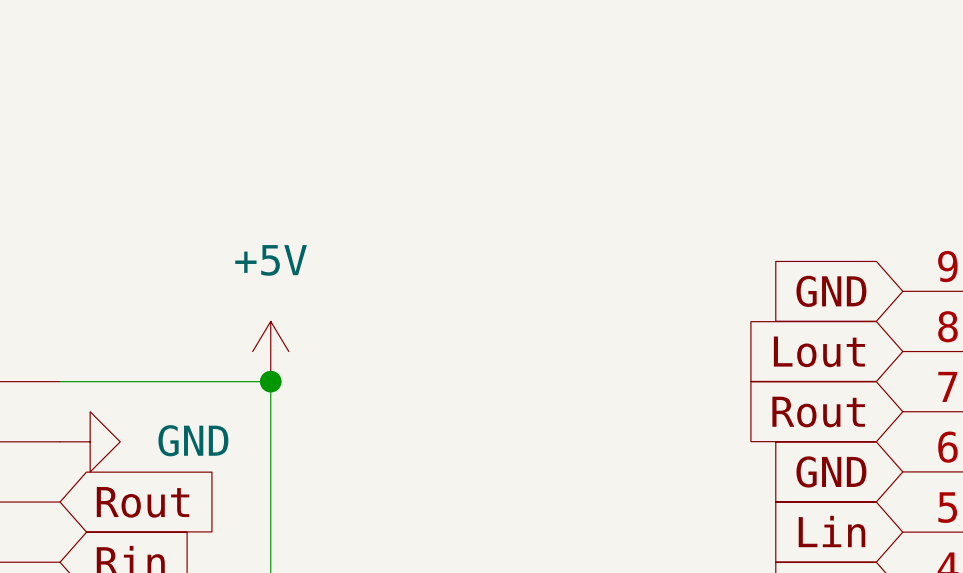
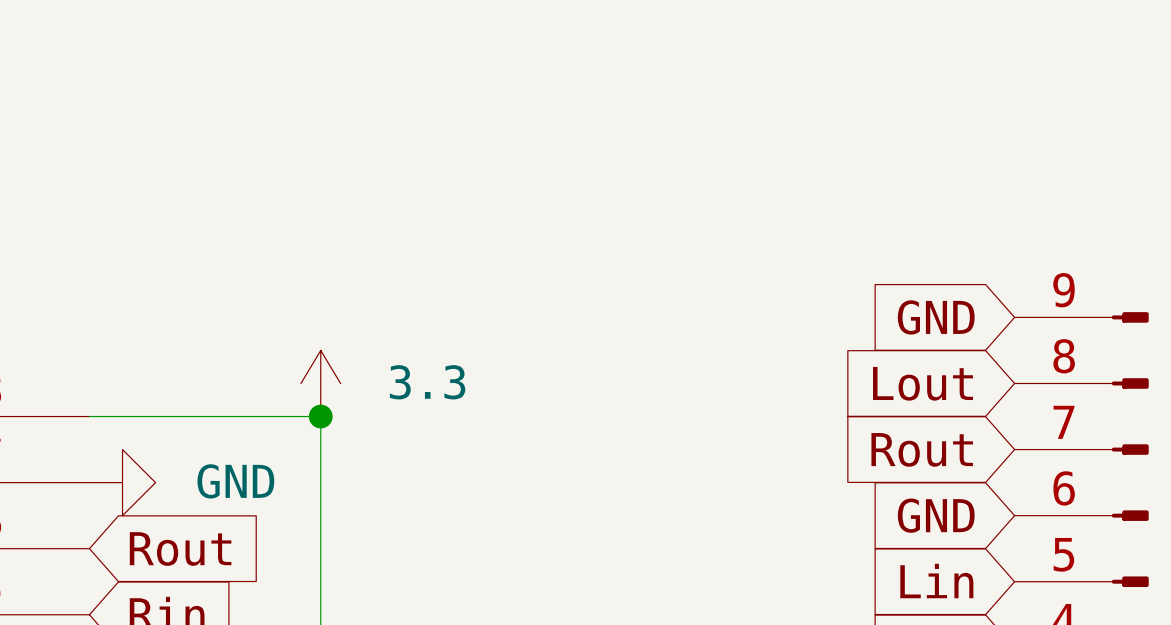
power symbol: +5V (270, 351) -> 3.3 (320, 383)

